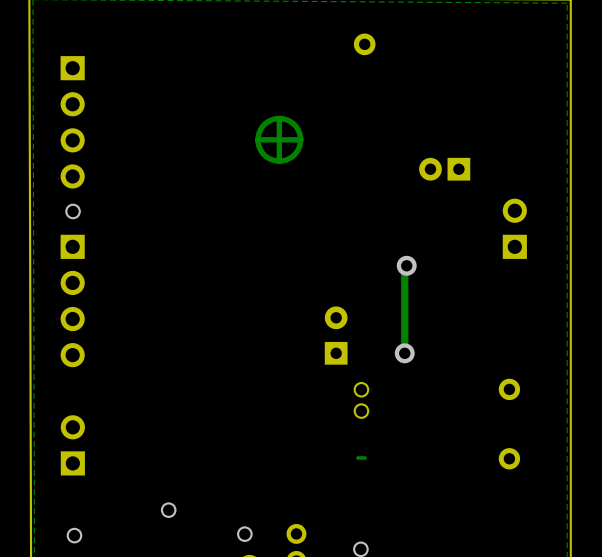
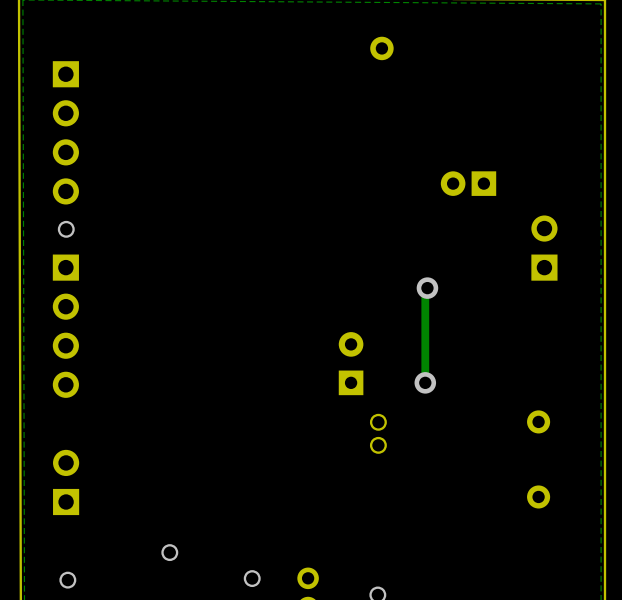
drawing: [255, 115, 304, 164] -> none
track: (365, 457) (357, 457) -> none

